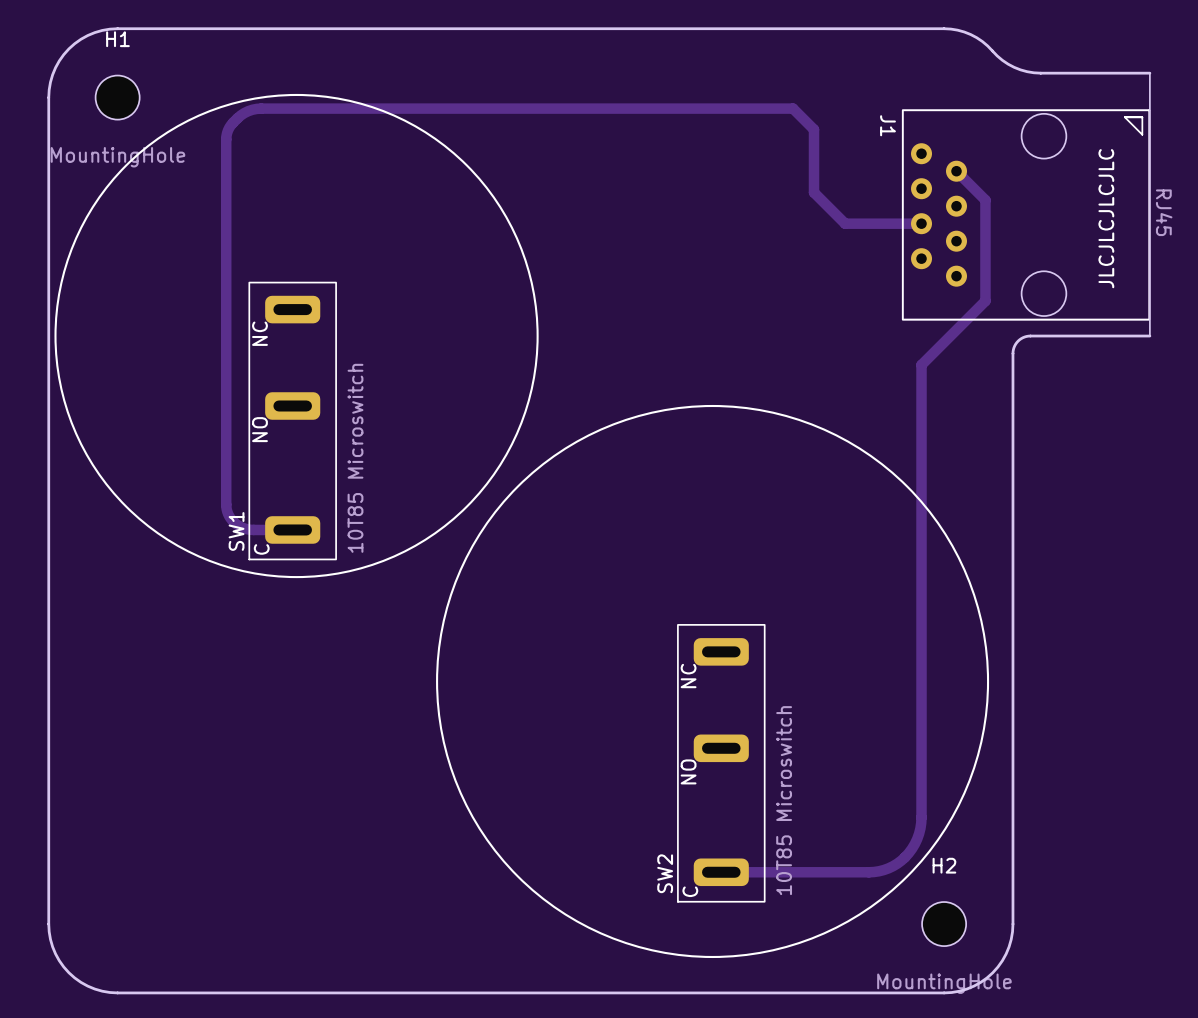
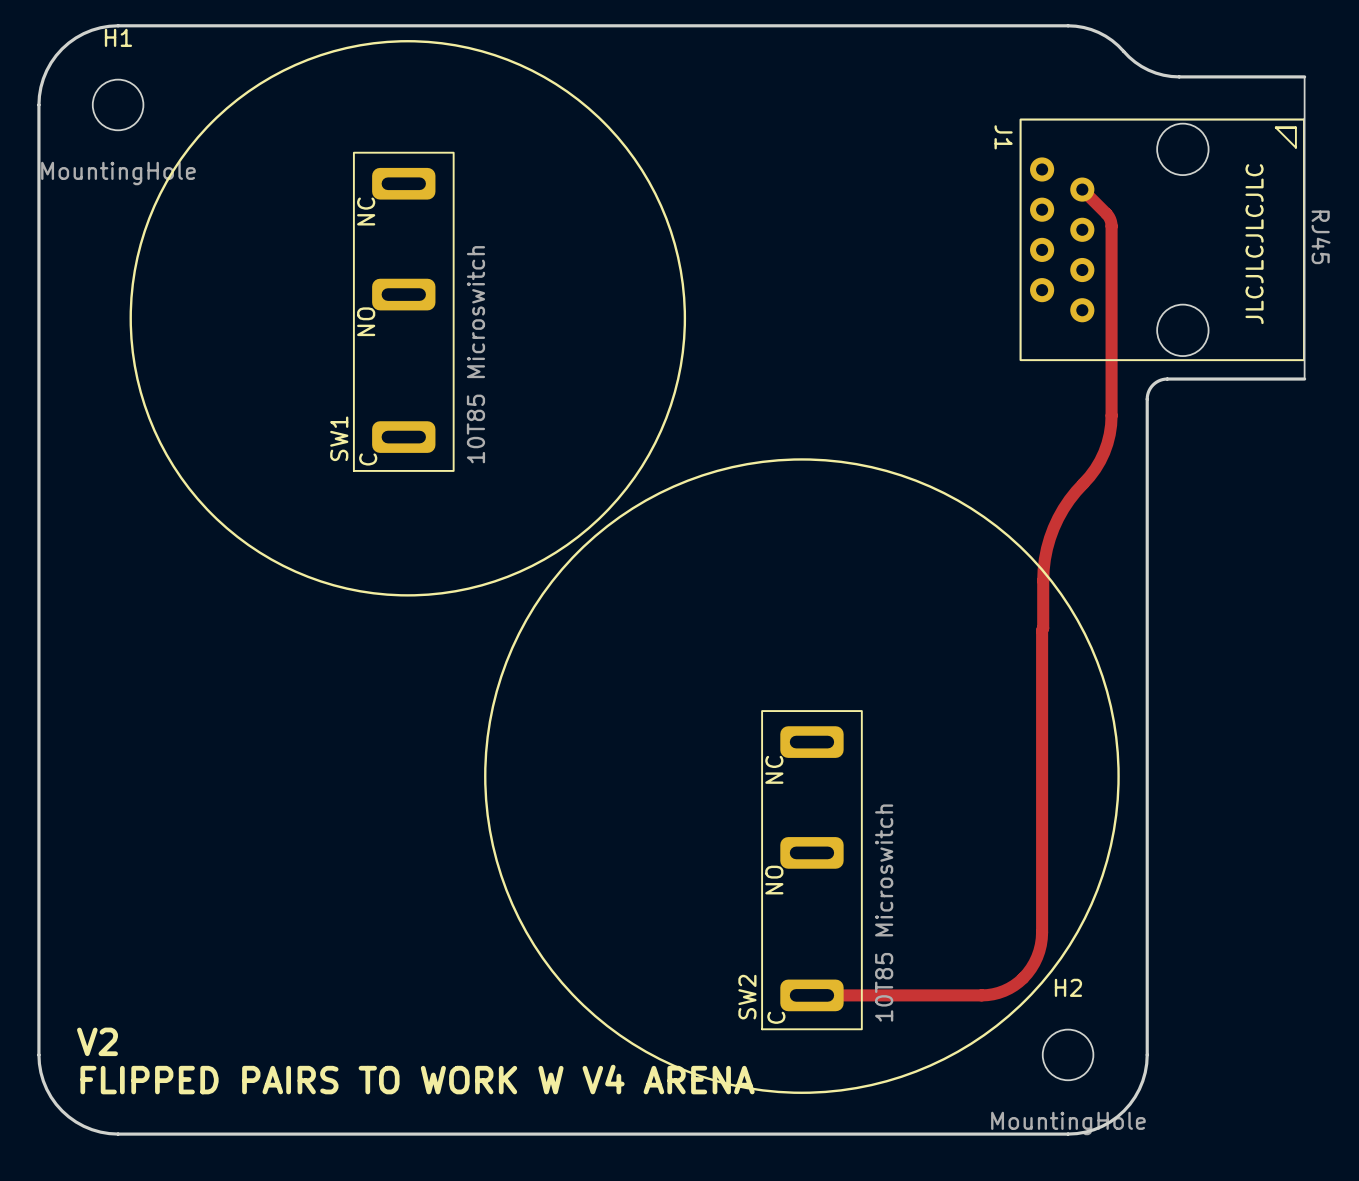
track: (977, 192) (985, 200) (985, 301) (921, 364) (921, 555) -> (1106, 213) (1111, 226) (1111, 415) (1109, 434) (1100, 460) (1063, 508) (1049, 538) (1043, 569) (1042, 631)
track: (921, 223) (845, 223) (814, 192) (814, 129) (793, 108) (261, 108) (248, 111) (231, 124) (226, 139) (226, 506) (231, 519) (245, 528) (292, 529) -> none
drawing position: (296, 336) -> (407, 318)
SW1 position: (292, 421) -> (403, 311)
text: none -> V2 (97, 1041)
text: none -> FLIPPED PAIRS TO WORK W V4 ARENA (417, 1079)

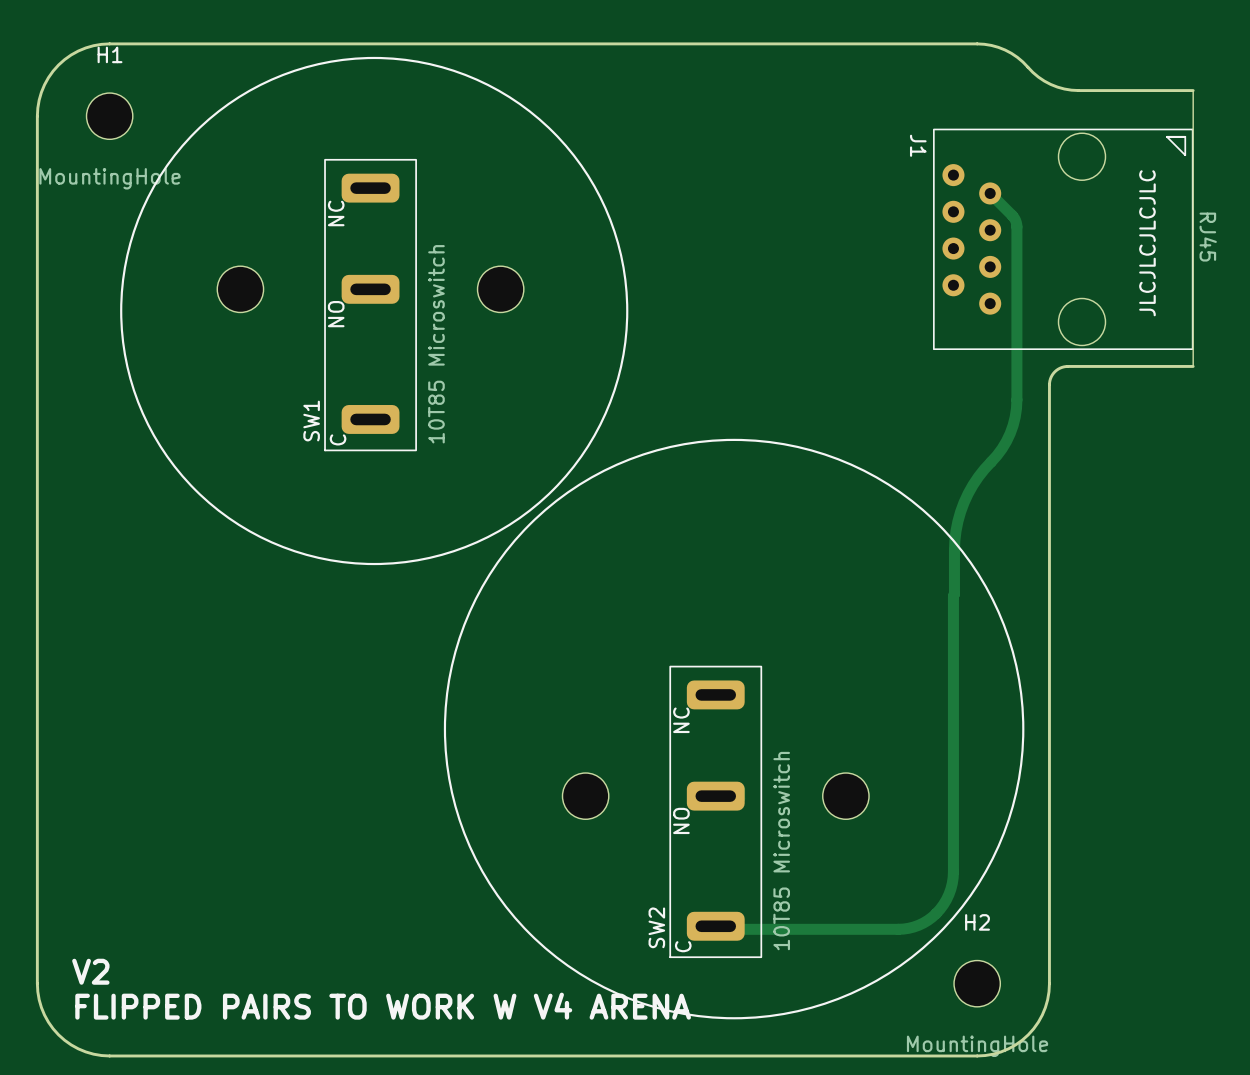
SW1 footprint: [352, 151, 455, 472] -> [217, 158, 524, 452]
SW2 footprint: [761, 710, 863, 1031] -> [562, 665, 870, 959]

